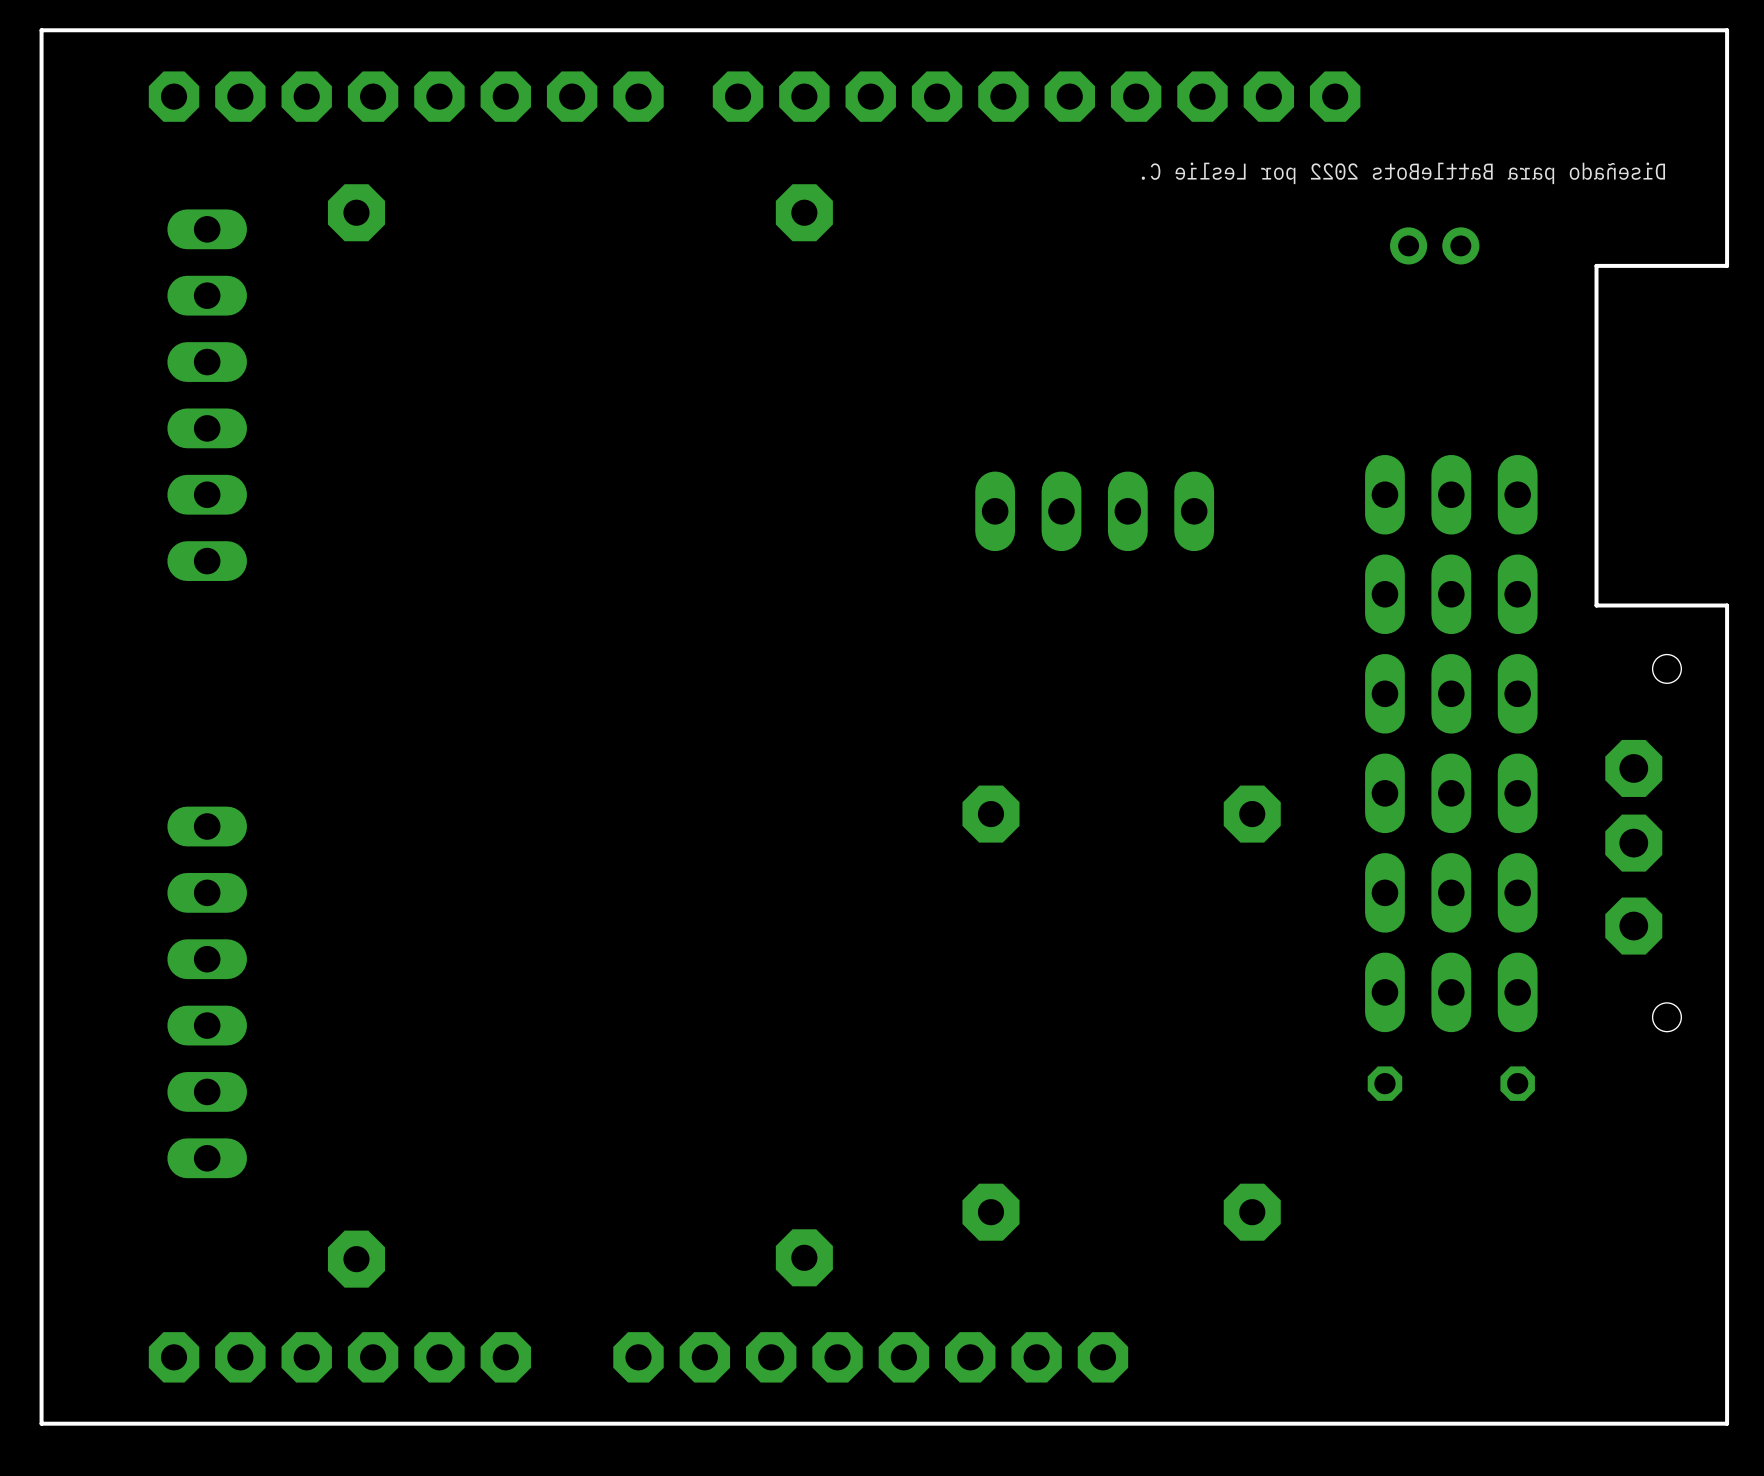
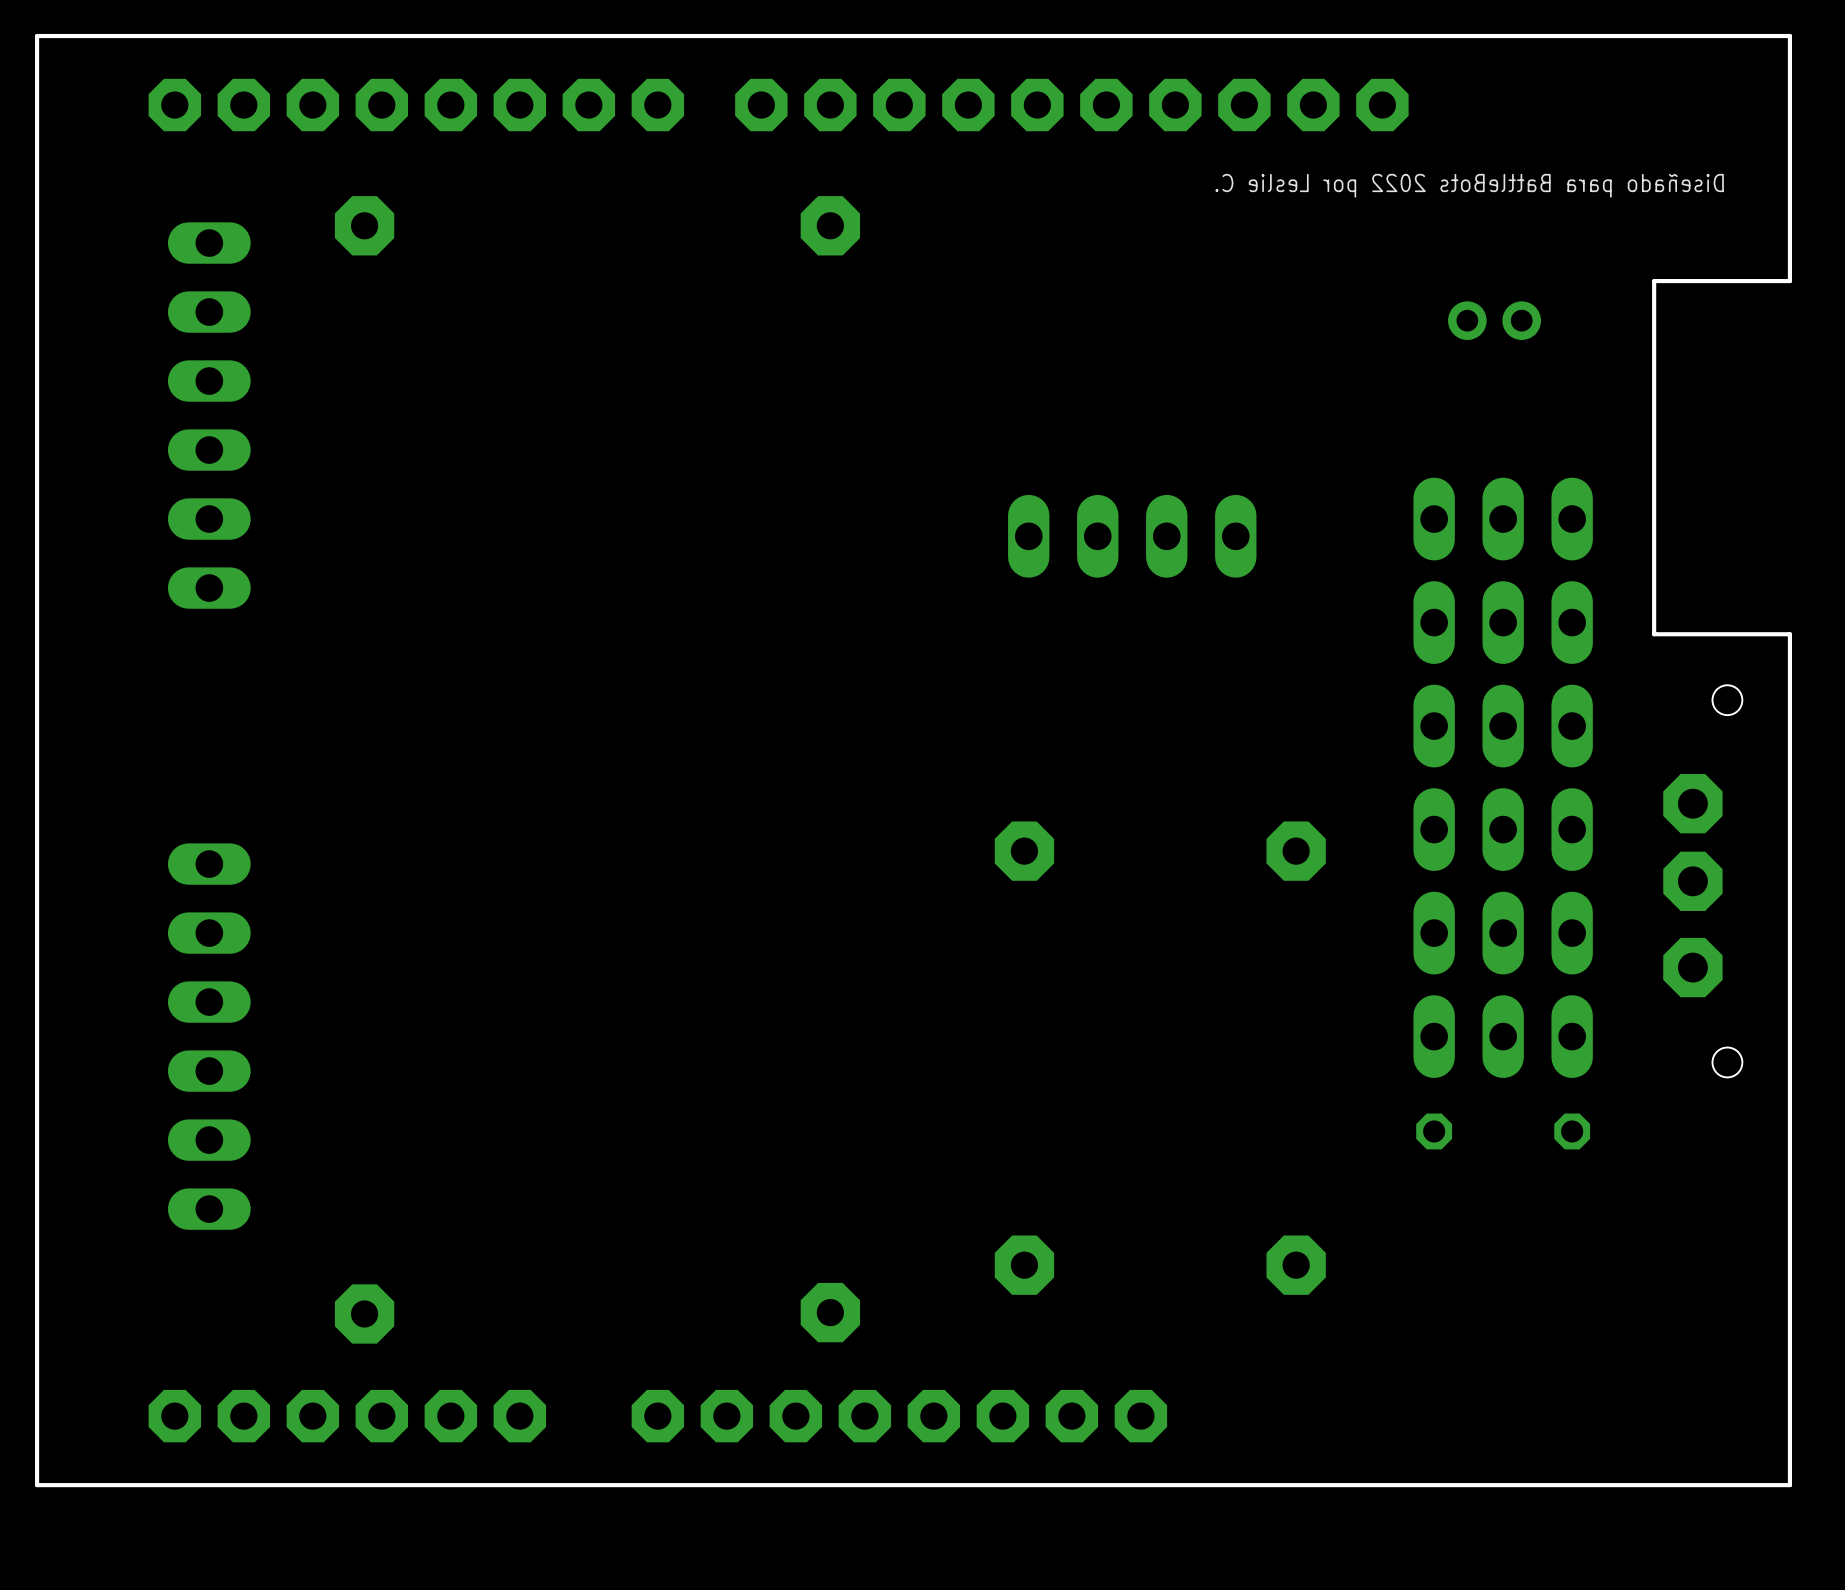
part position: (1434, 245) -> (1494, 320)

